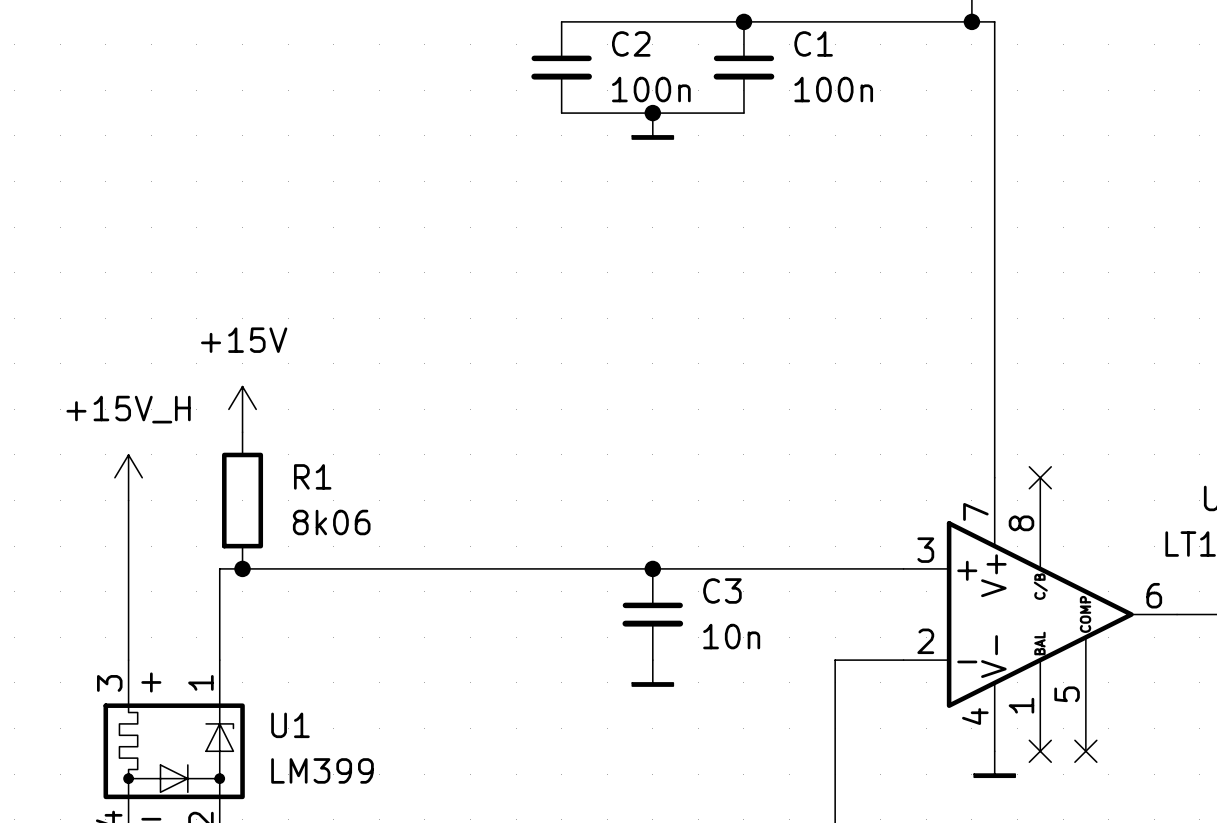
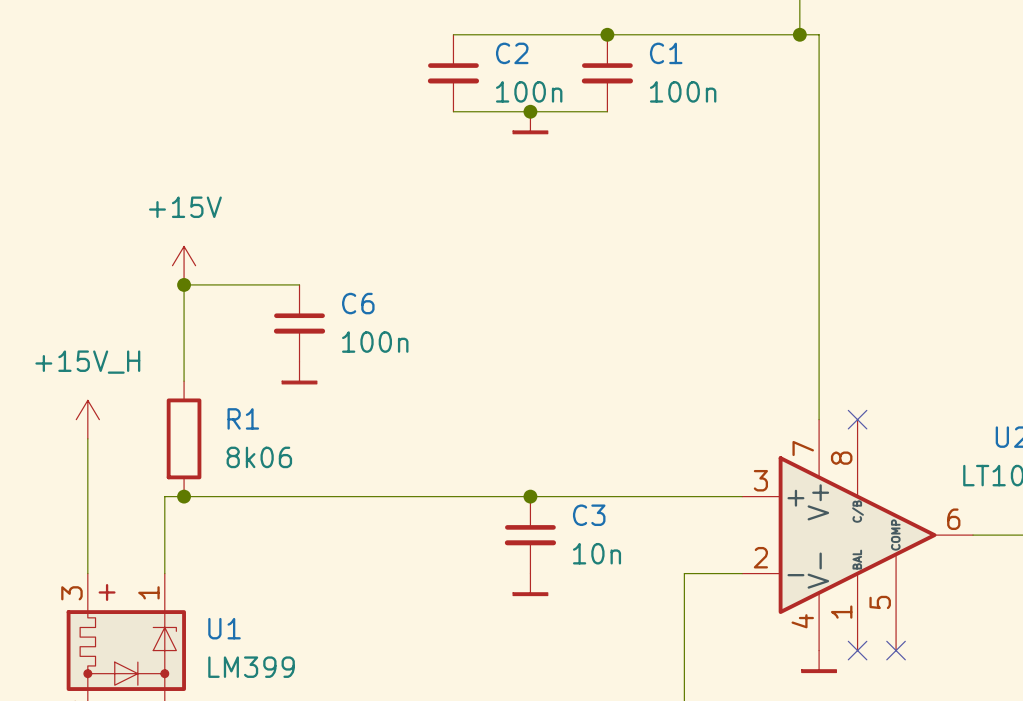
junction: none -> (184, 284)
wire: none -> (299, 284) (184, 284) (184, 381)
C6: none -> 100n (299, 323)
power symbol position: +15V (242, 409) -> +15V (184, 265)
power symbol: none -> (299, 372)

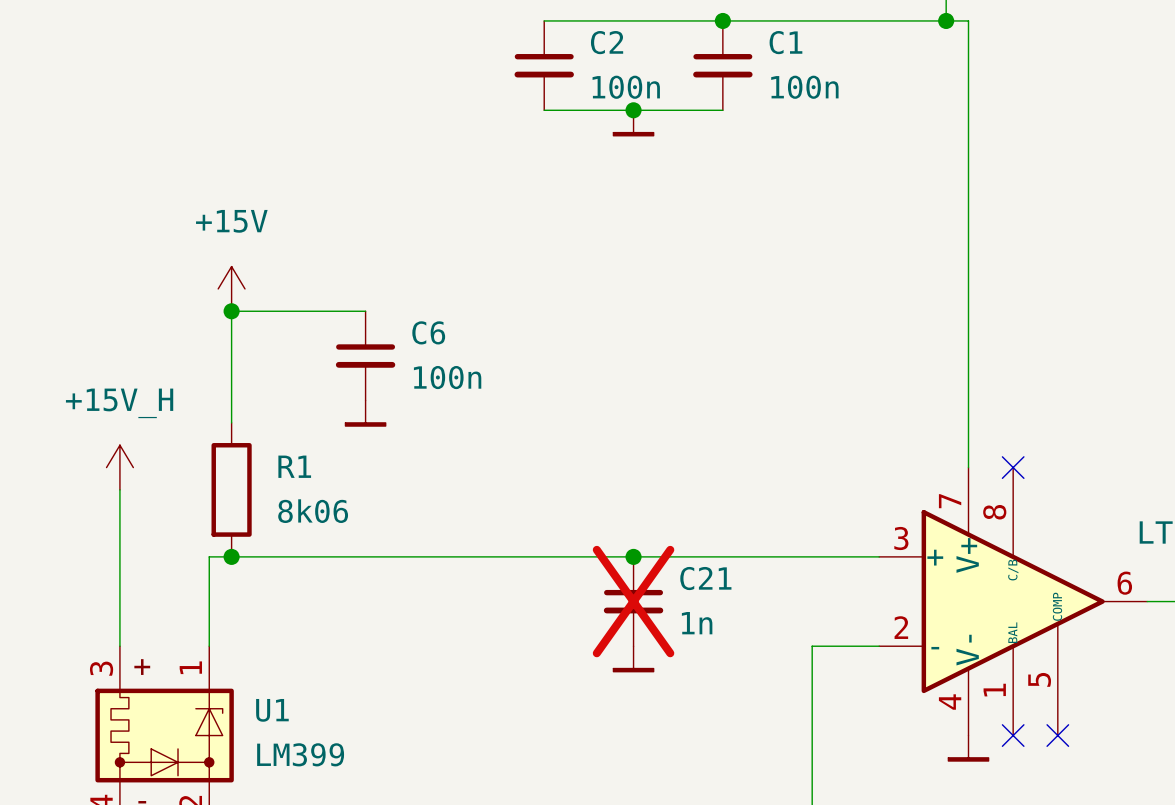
C3 name: C3 (589, 515) -> C21 (705, 578)
C3 do-not-place cross: none -> (633, 601)
C3 value: 10n (597, 553) -> 1n (697, 623)

